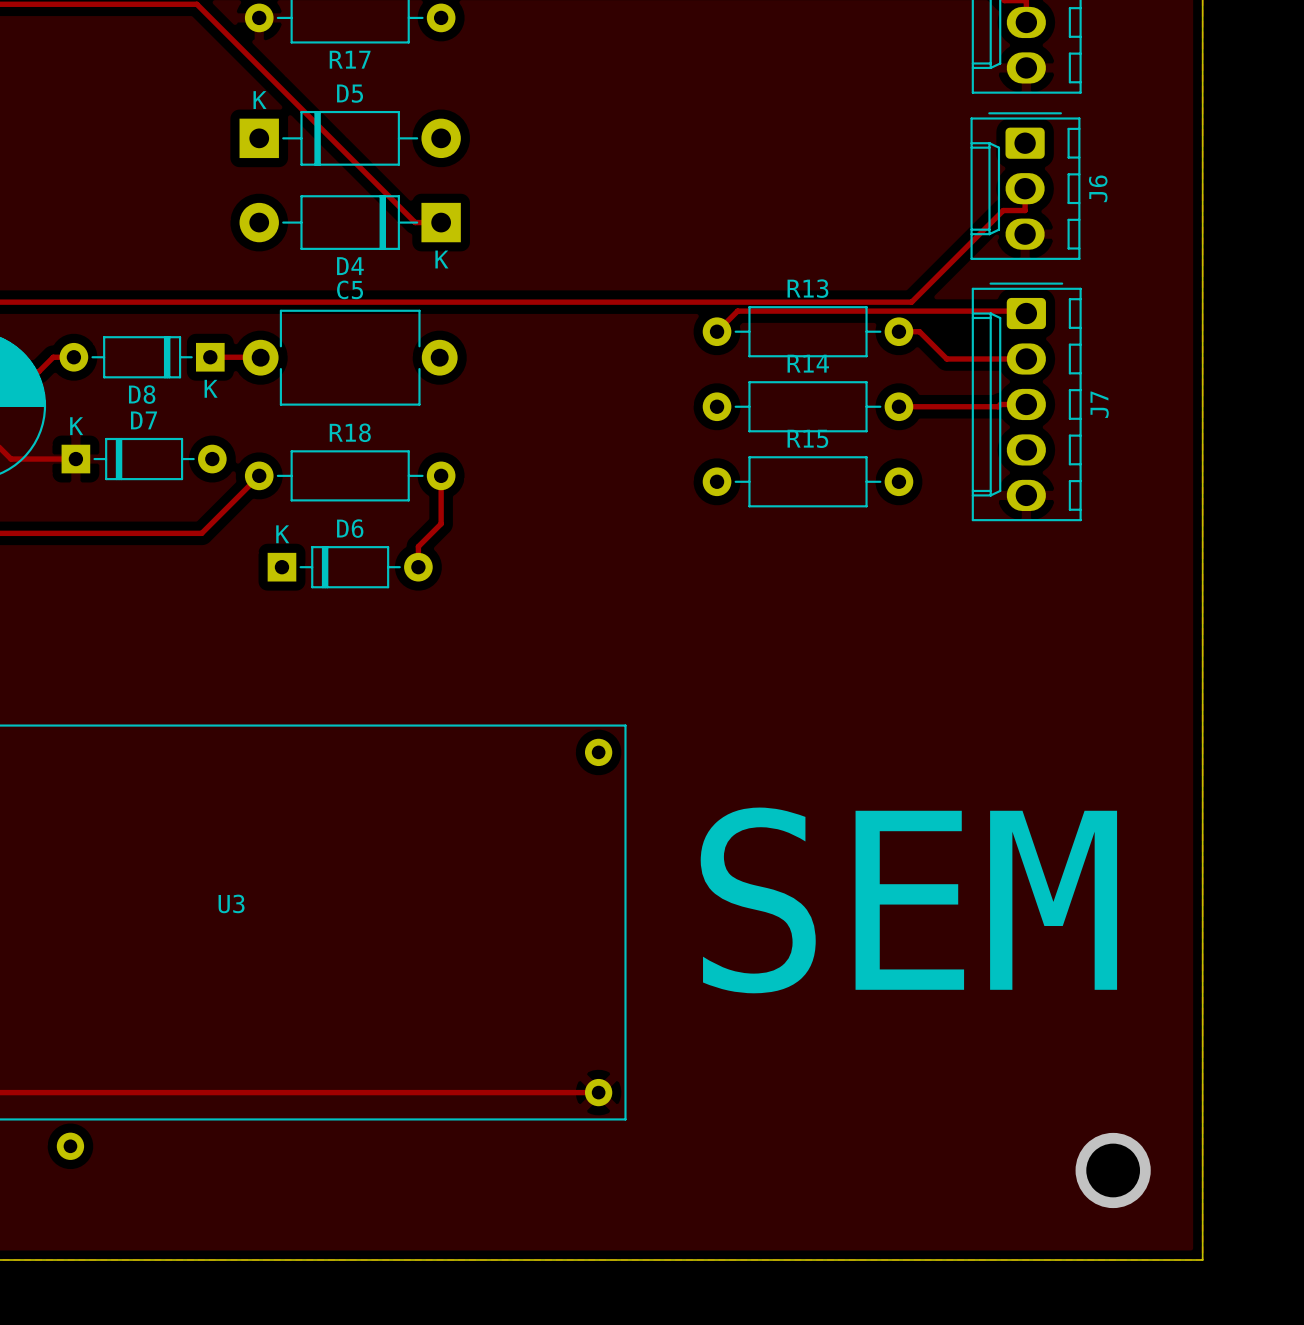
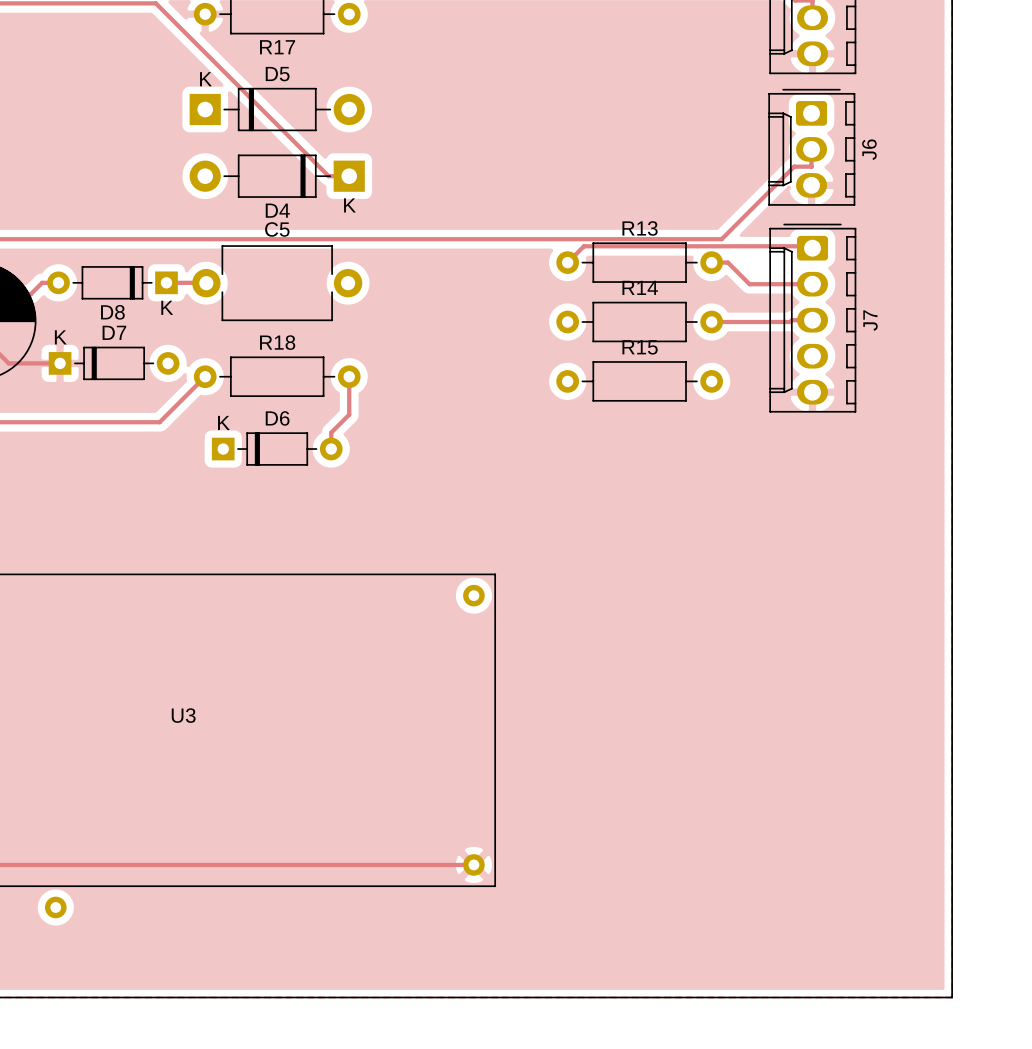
text: SEM (908, 900) -> none
via: (1113, 1170) -> none

